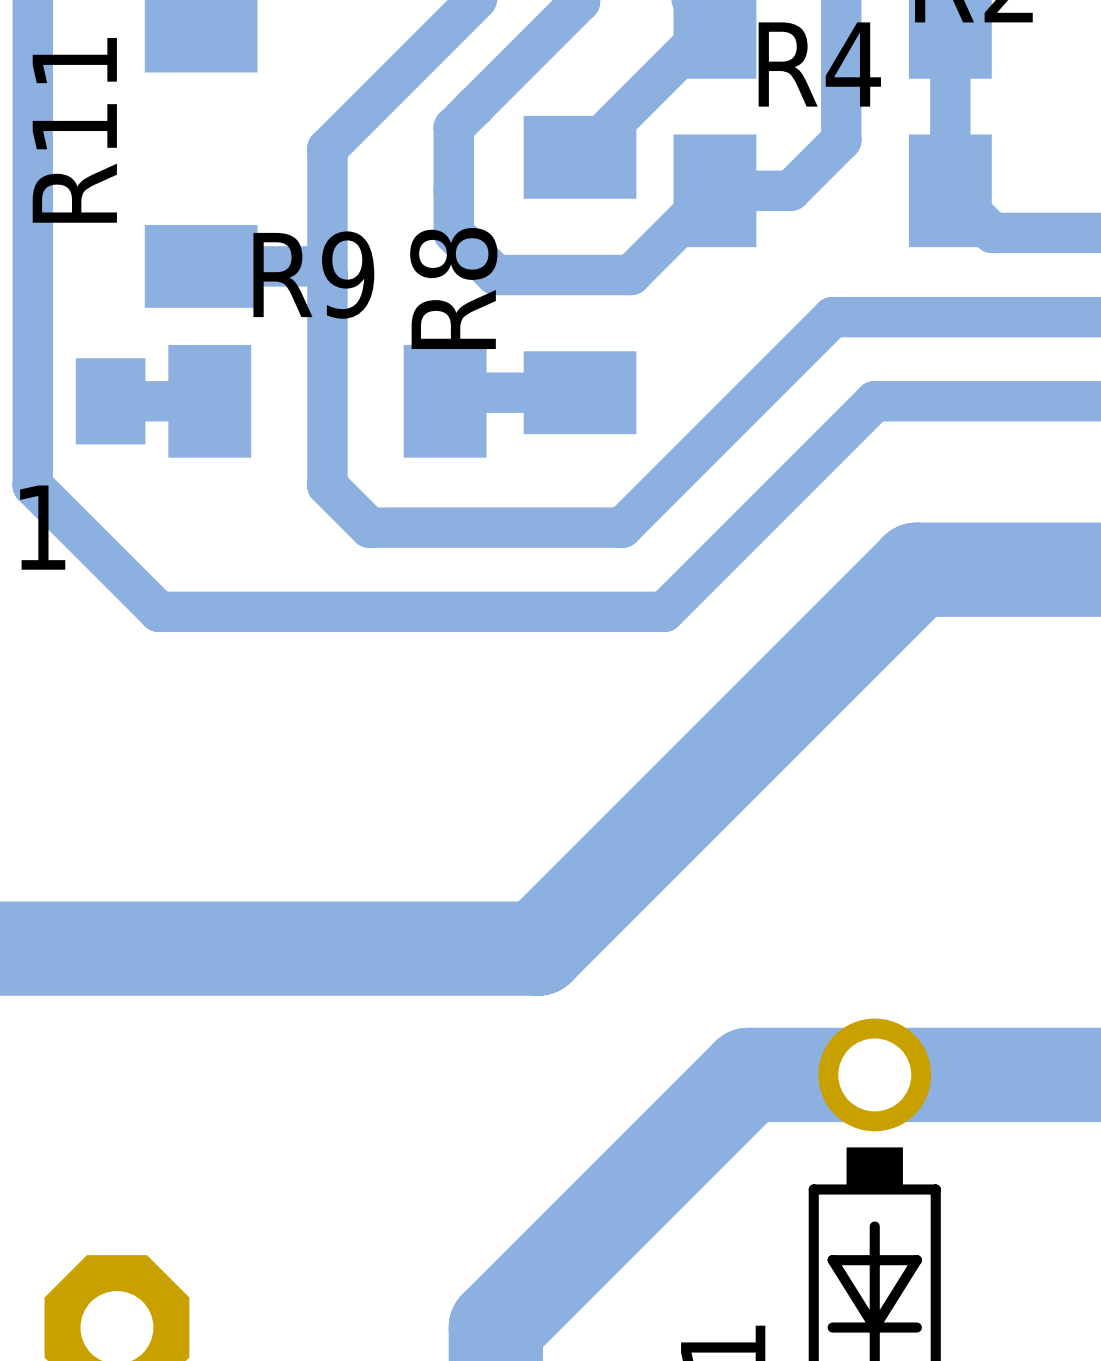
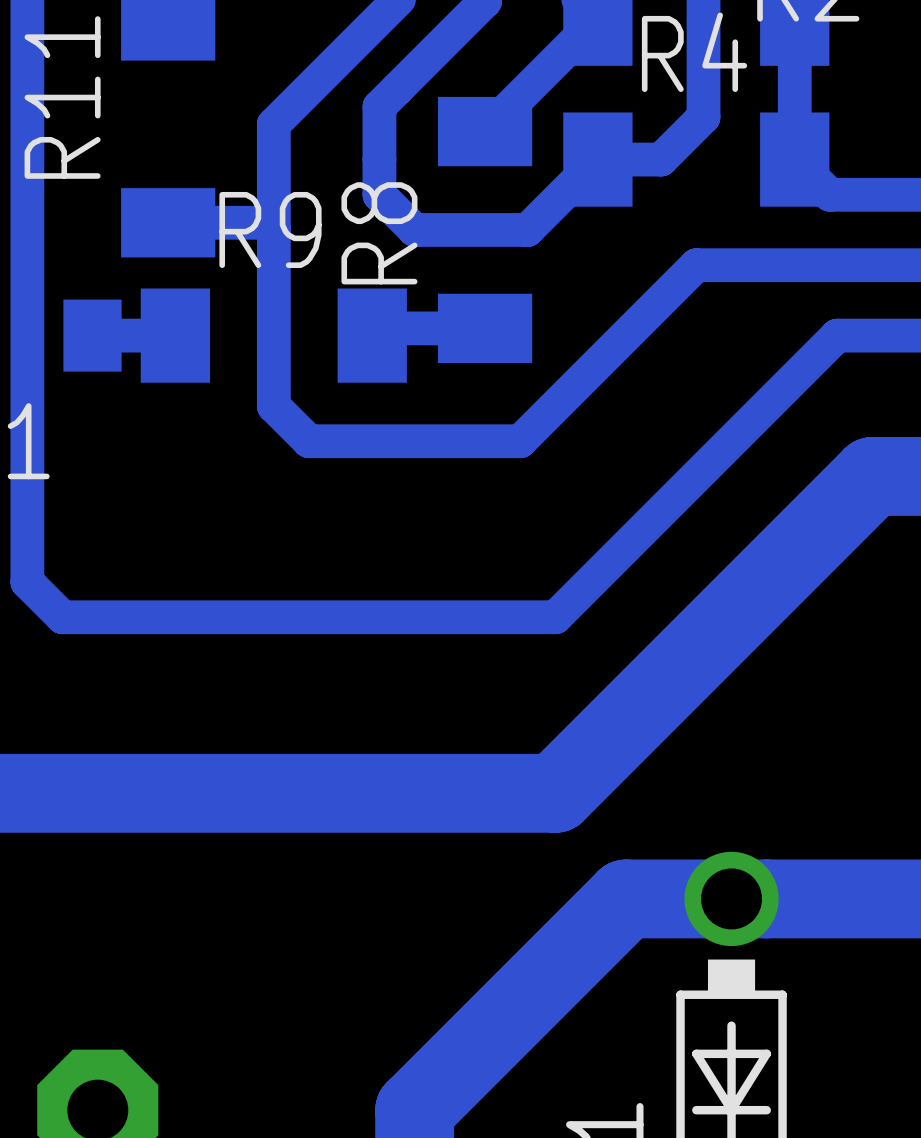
track: (1001, 401) (874, 401) (664, 611) (159, 611) (32, 485) -> (837, 335) (555, 617) (62, 617) (27, 582) (27, 406)
track: (1043, 569) (916, 569) (537, 948) -> (872, 476) (555, 793) (449, 793)

